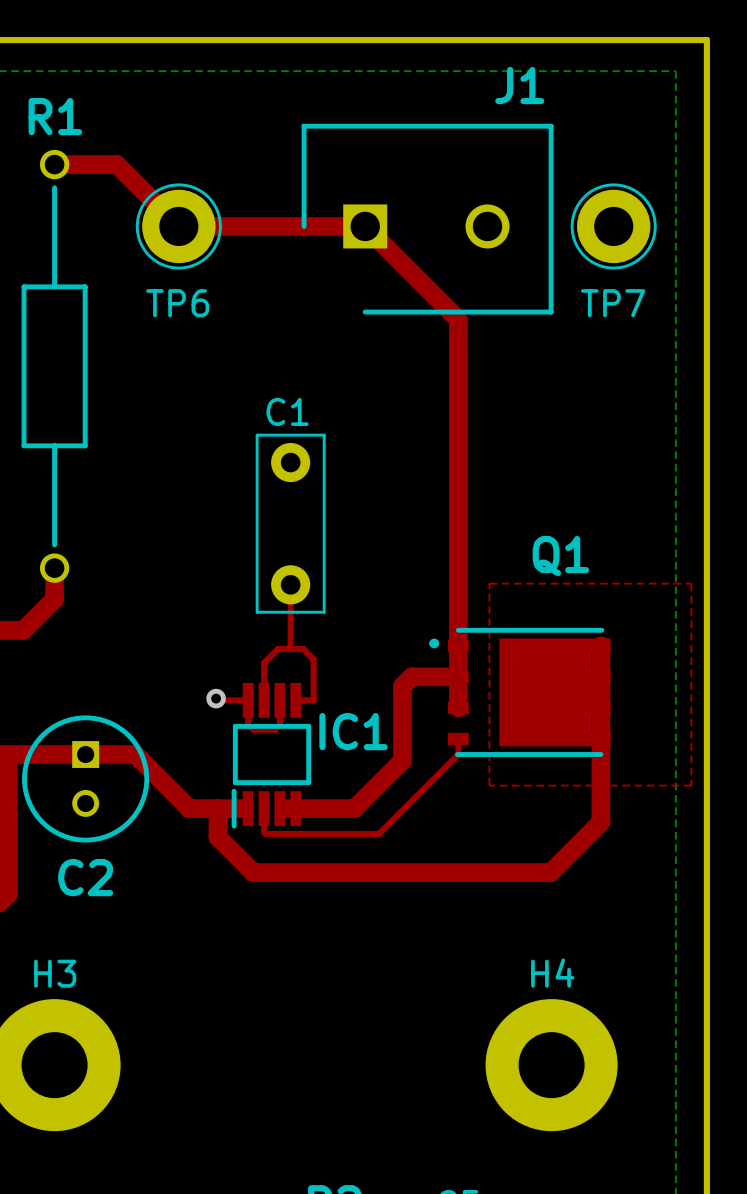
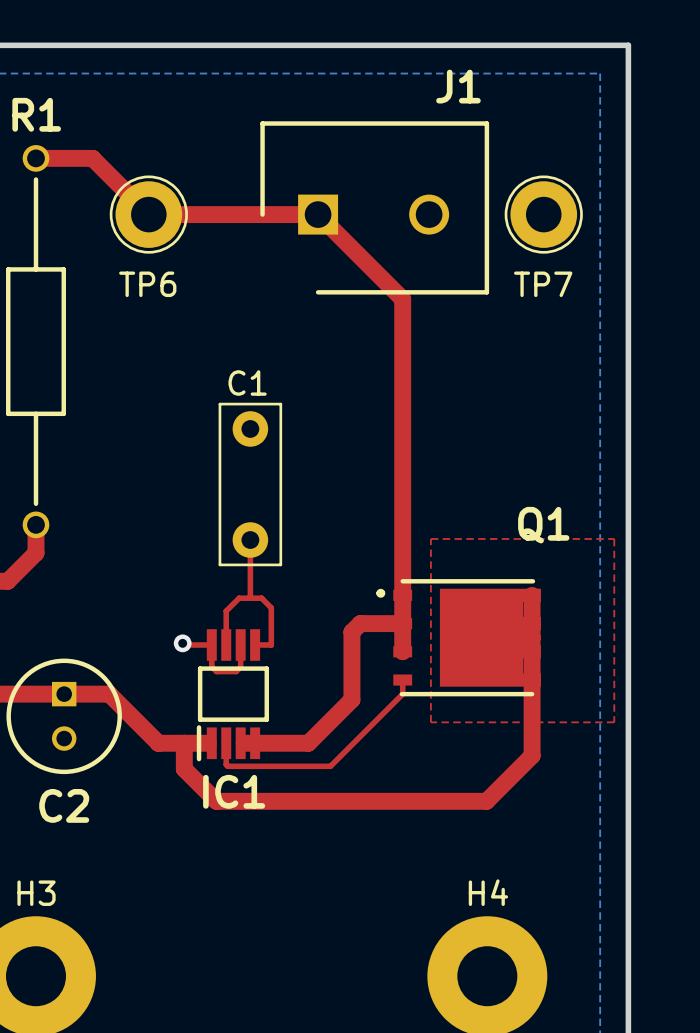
Q1 name position: Q1 (560, 556) -> Q1 (543, 525)
IC1 name position: IC1 (353, 731) -> IC1 (234, 791)

